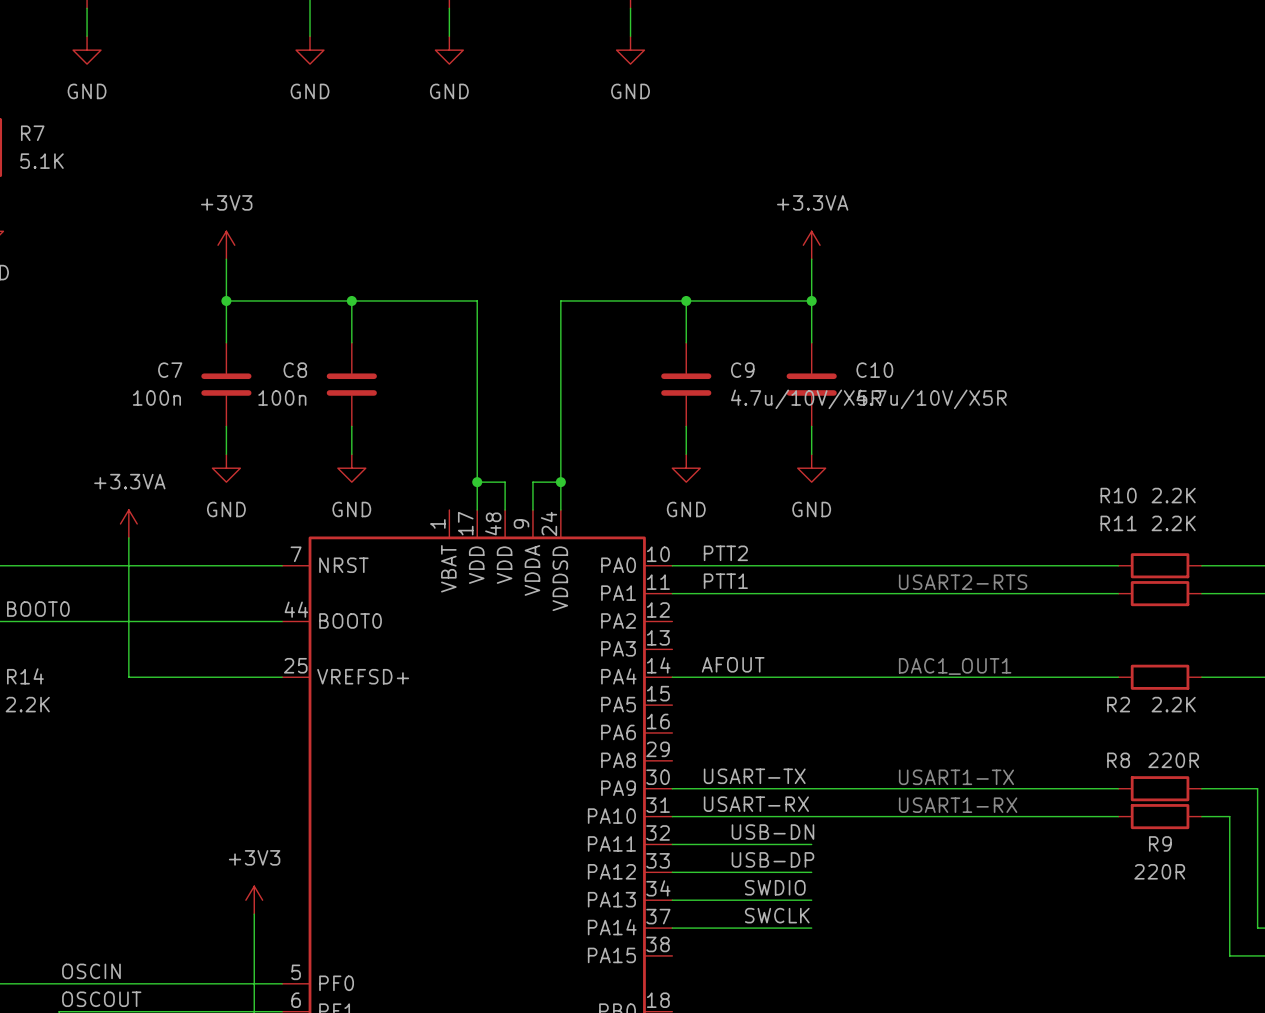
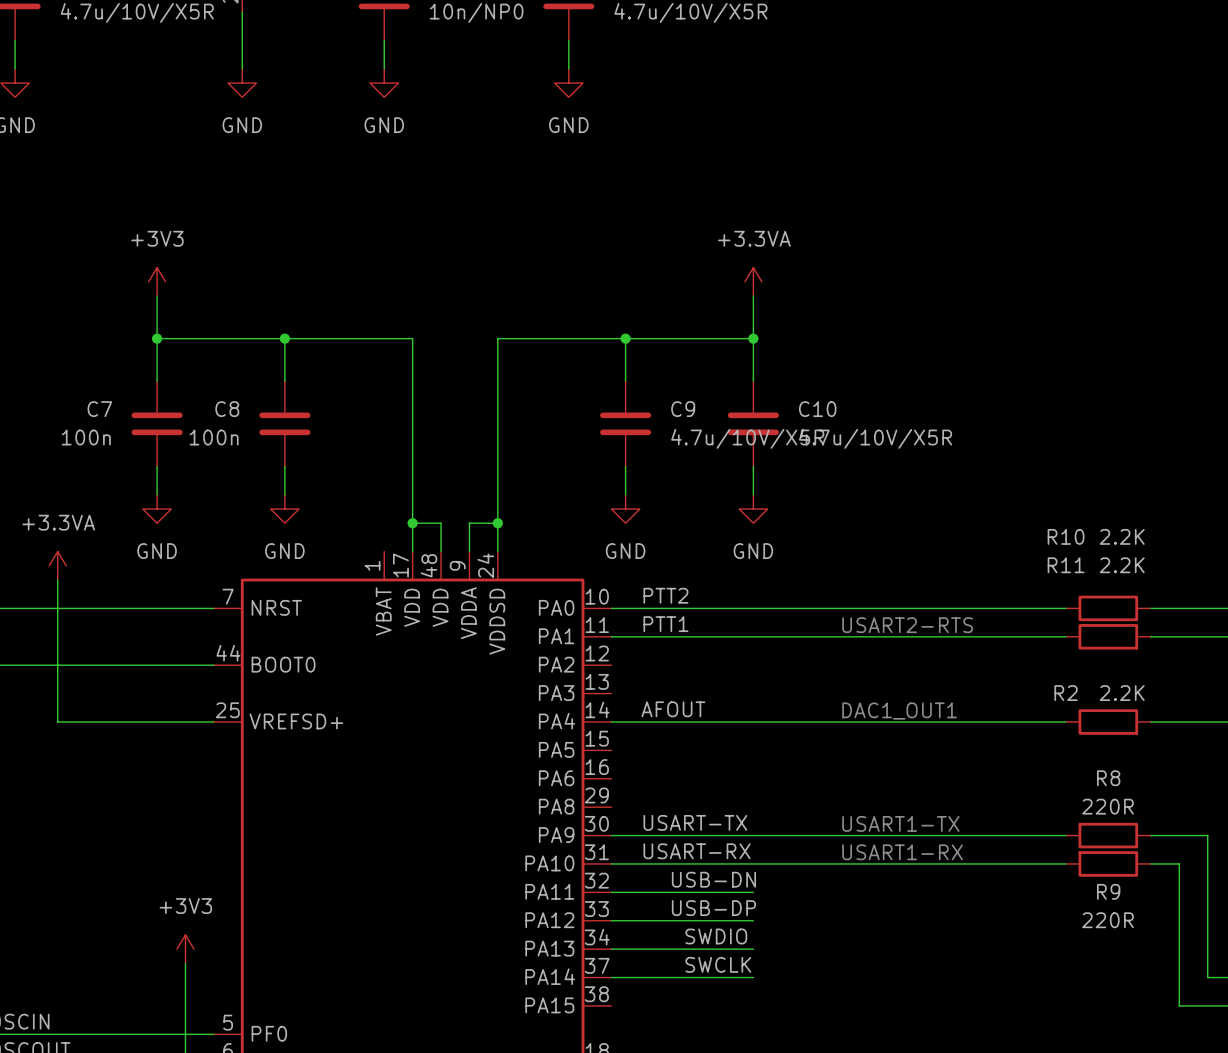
R2 name position: R2 (1118, 704) -> R2 (1066, 693)
R2 value position: 2.2K (1173, 704) -> 2.2K (1122, 693)
R8 name position: R8 (1118, 760) -> R8 (1108, 778)
R8 value position: 220R (1173, 760) -> 220R (1107, 806)

